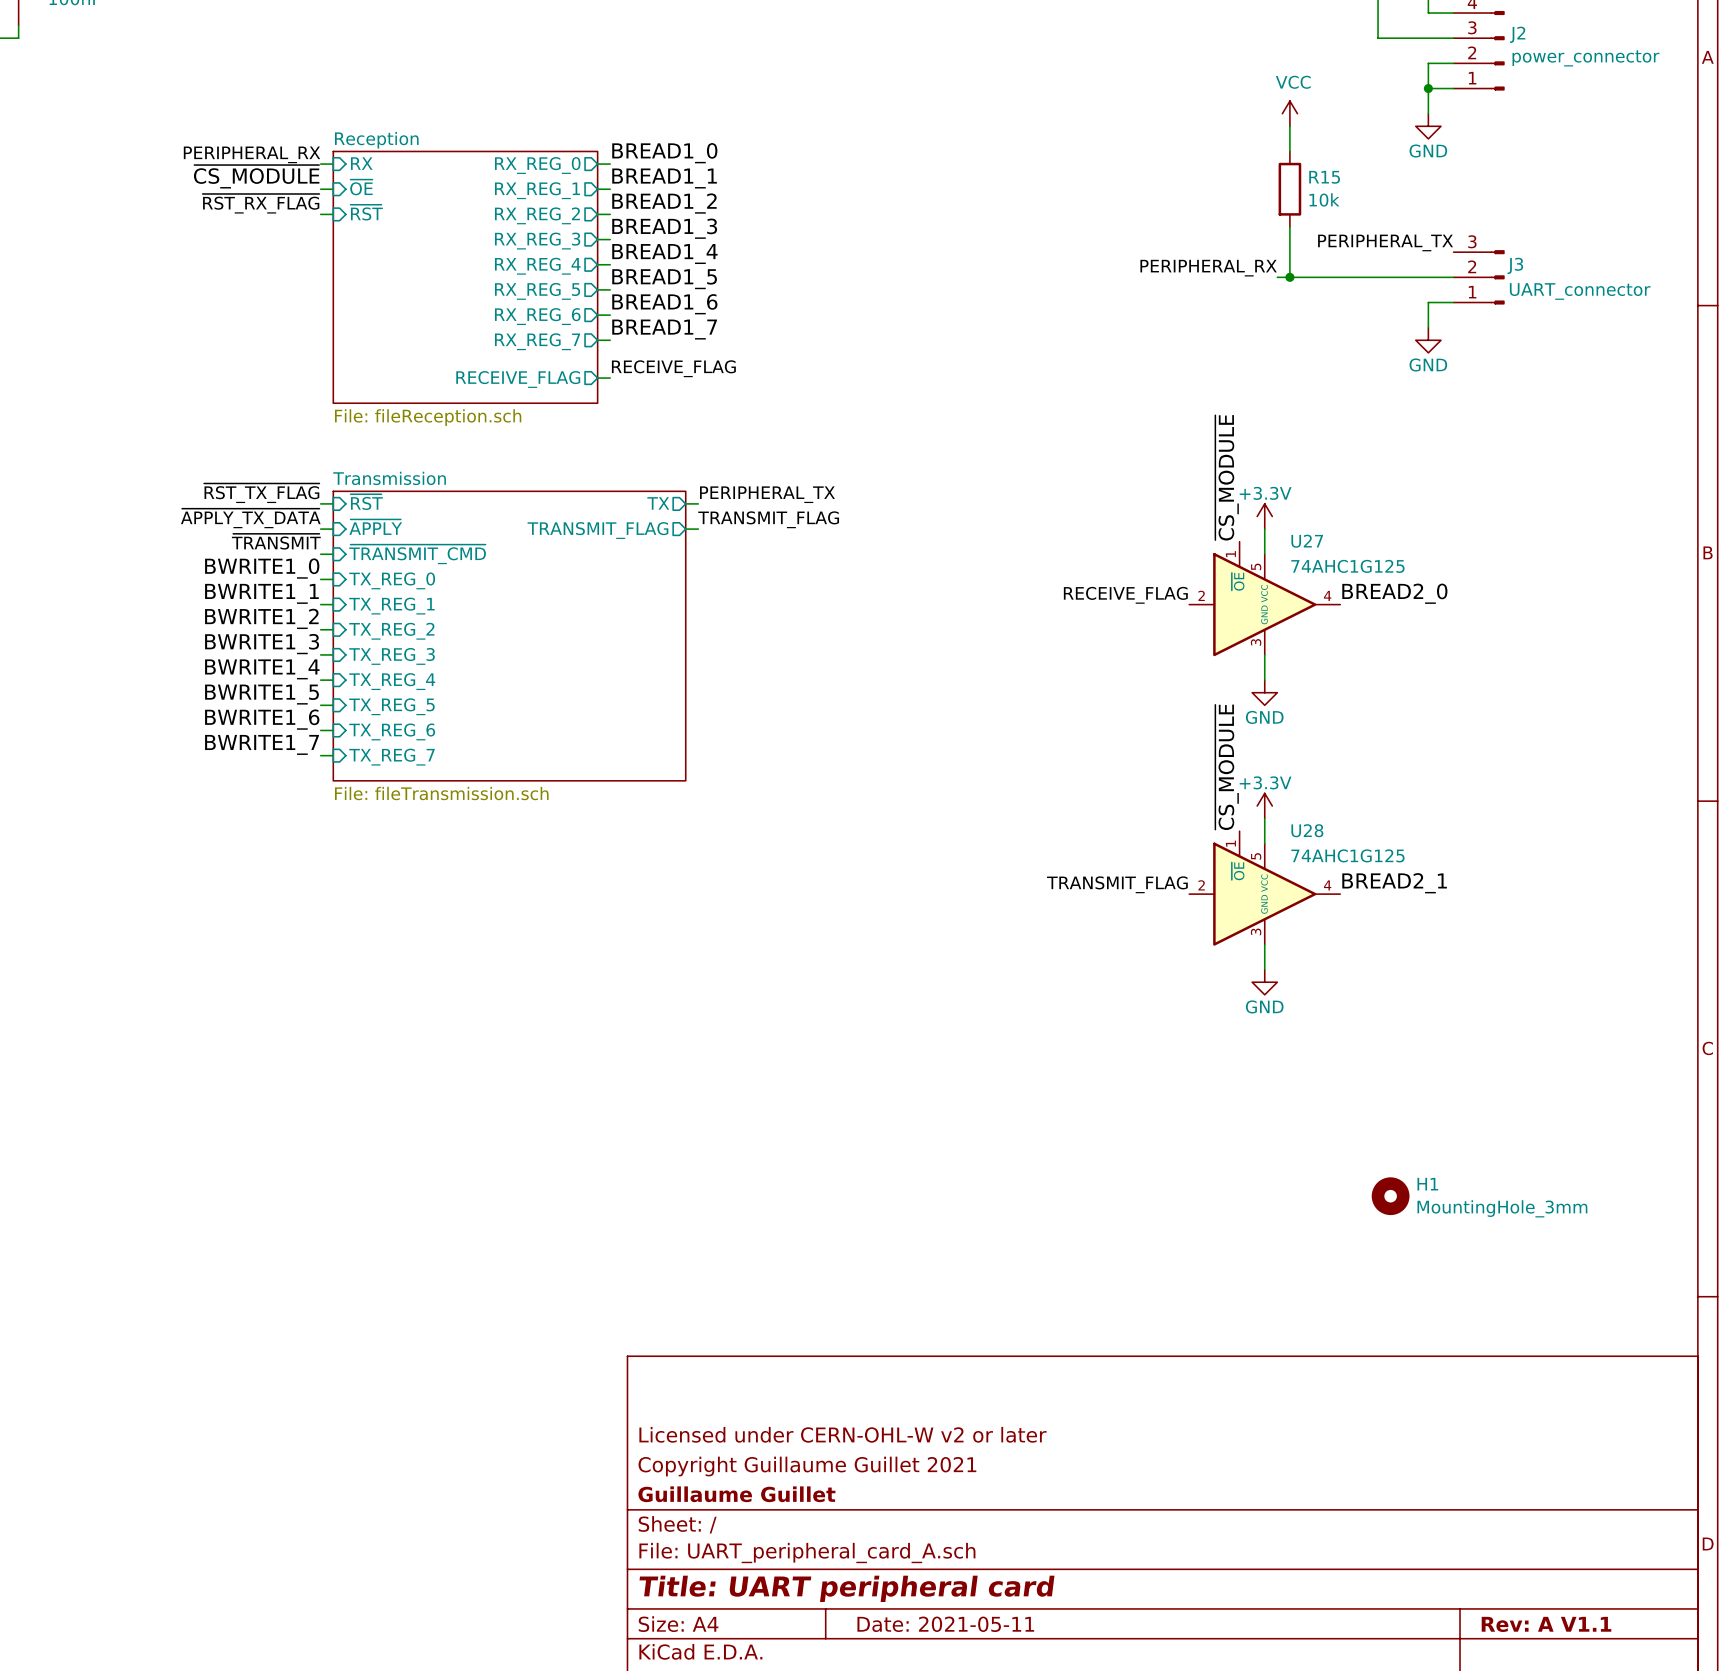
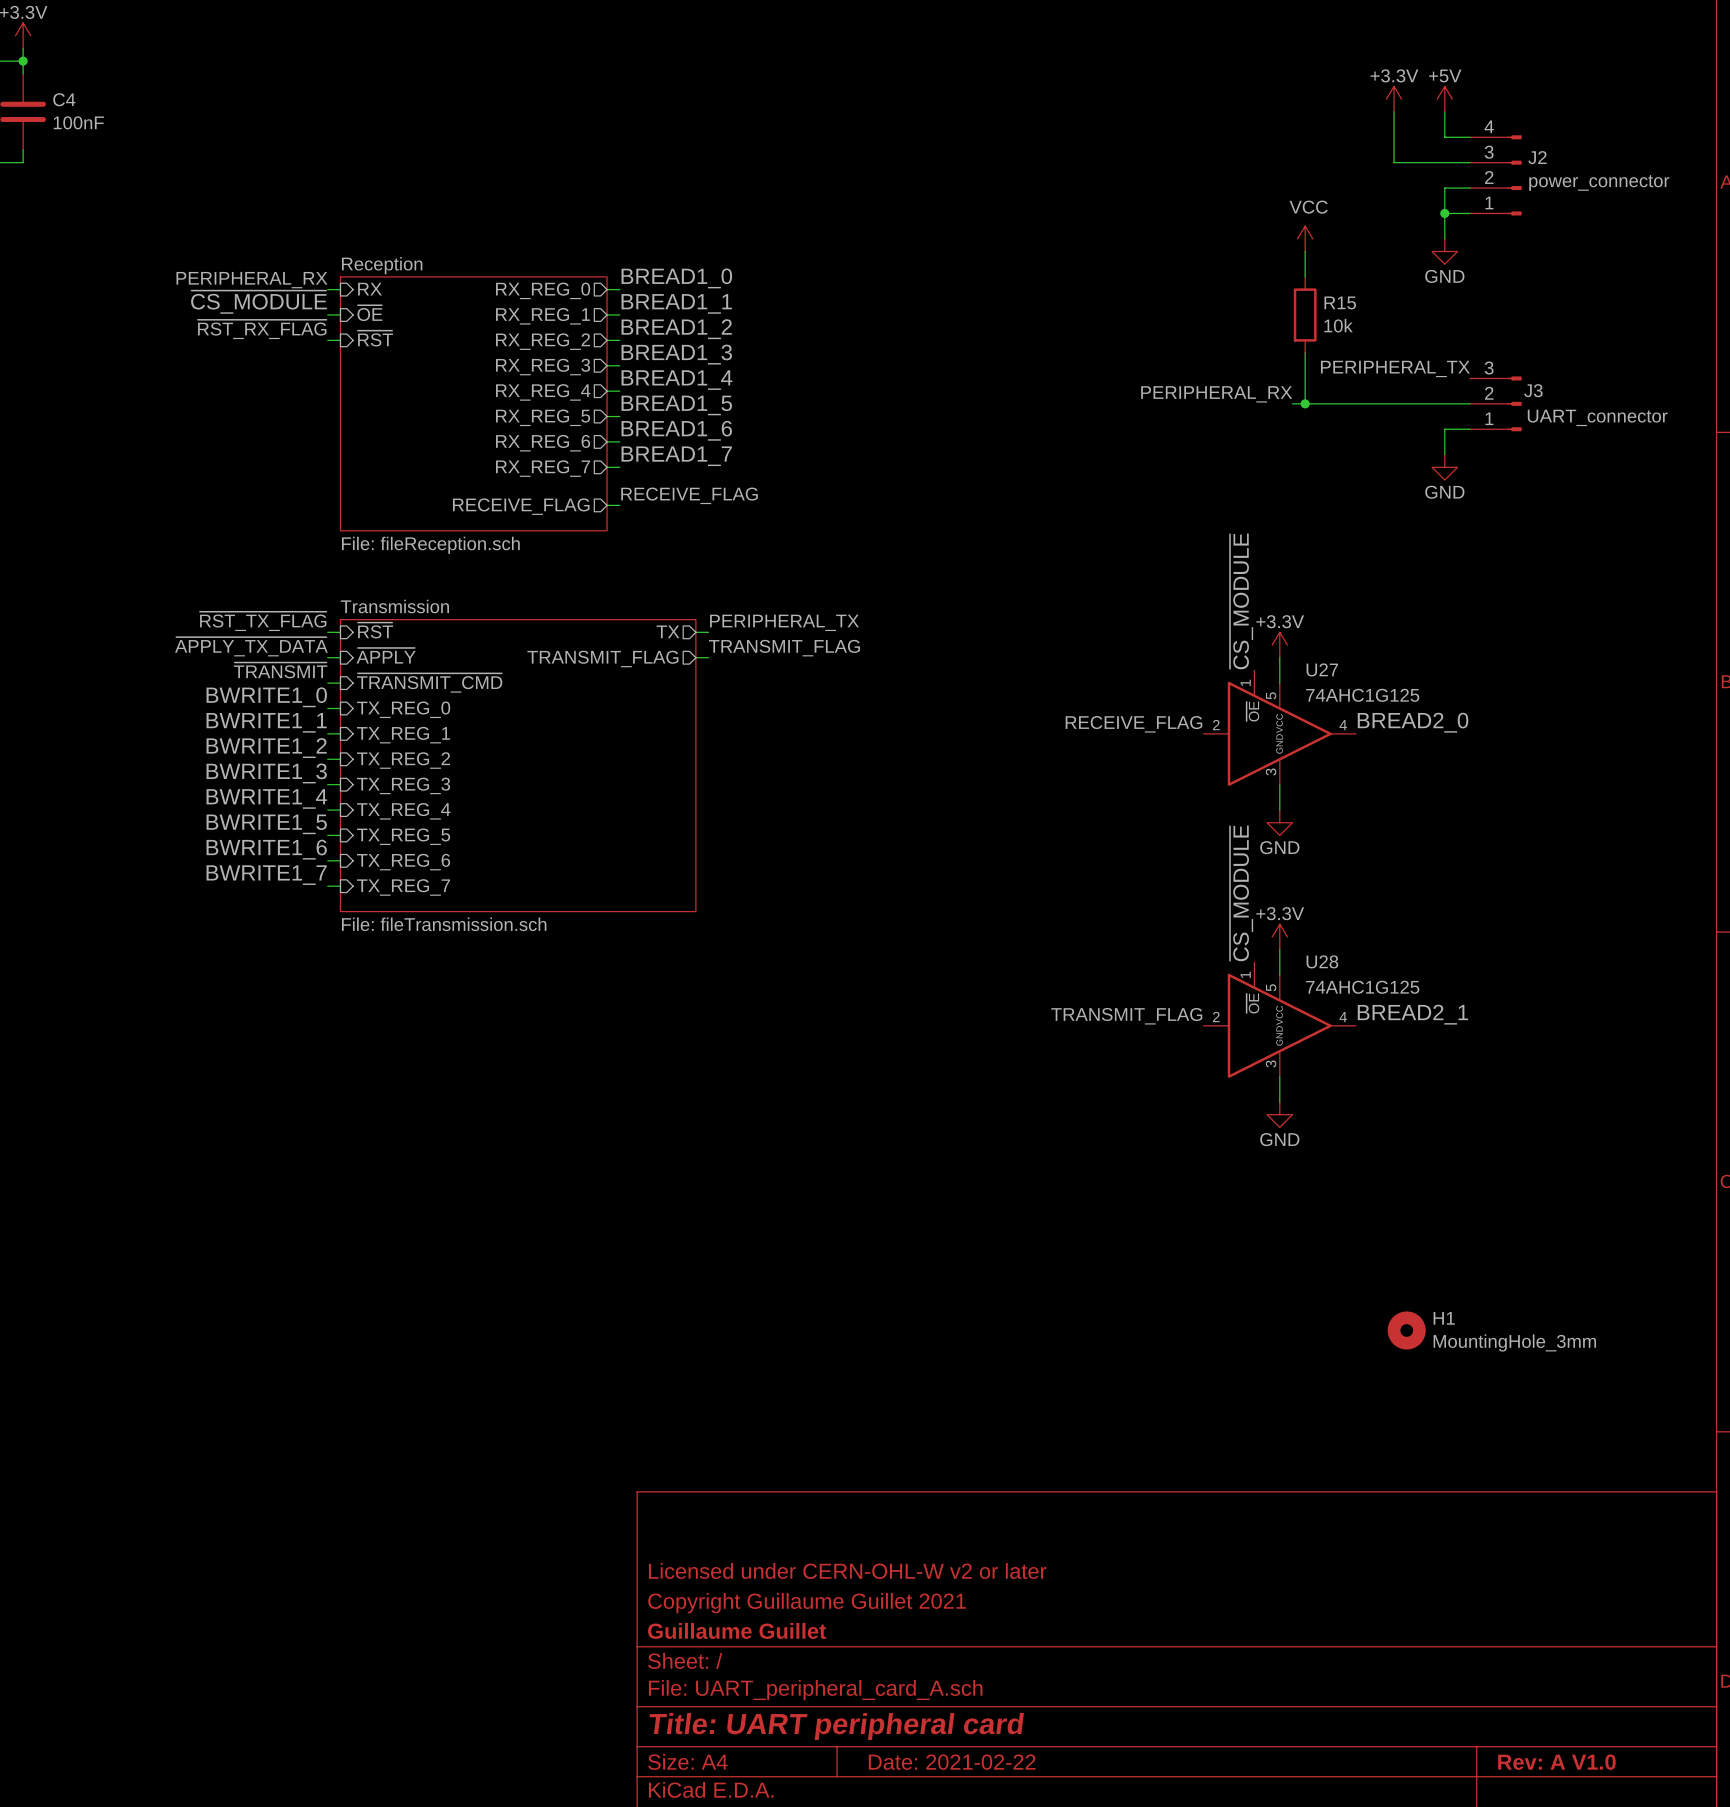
title block: Date: 2021-05-11 (945, 1624) -> Date: 2021-02-22 (952, 1762)
title block: Rev: A V1.1 (1546, 1624) -> Rev: A V1.0 (1556, 1762)

